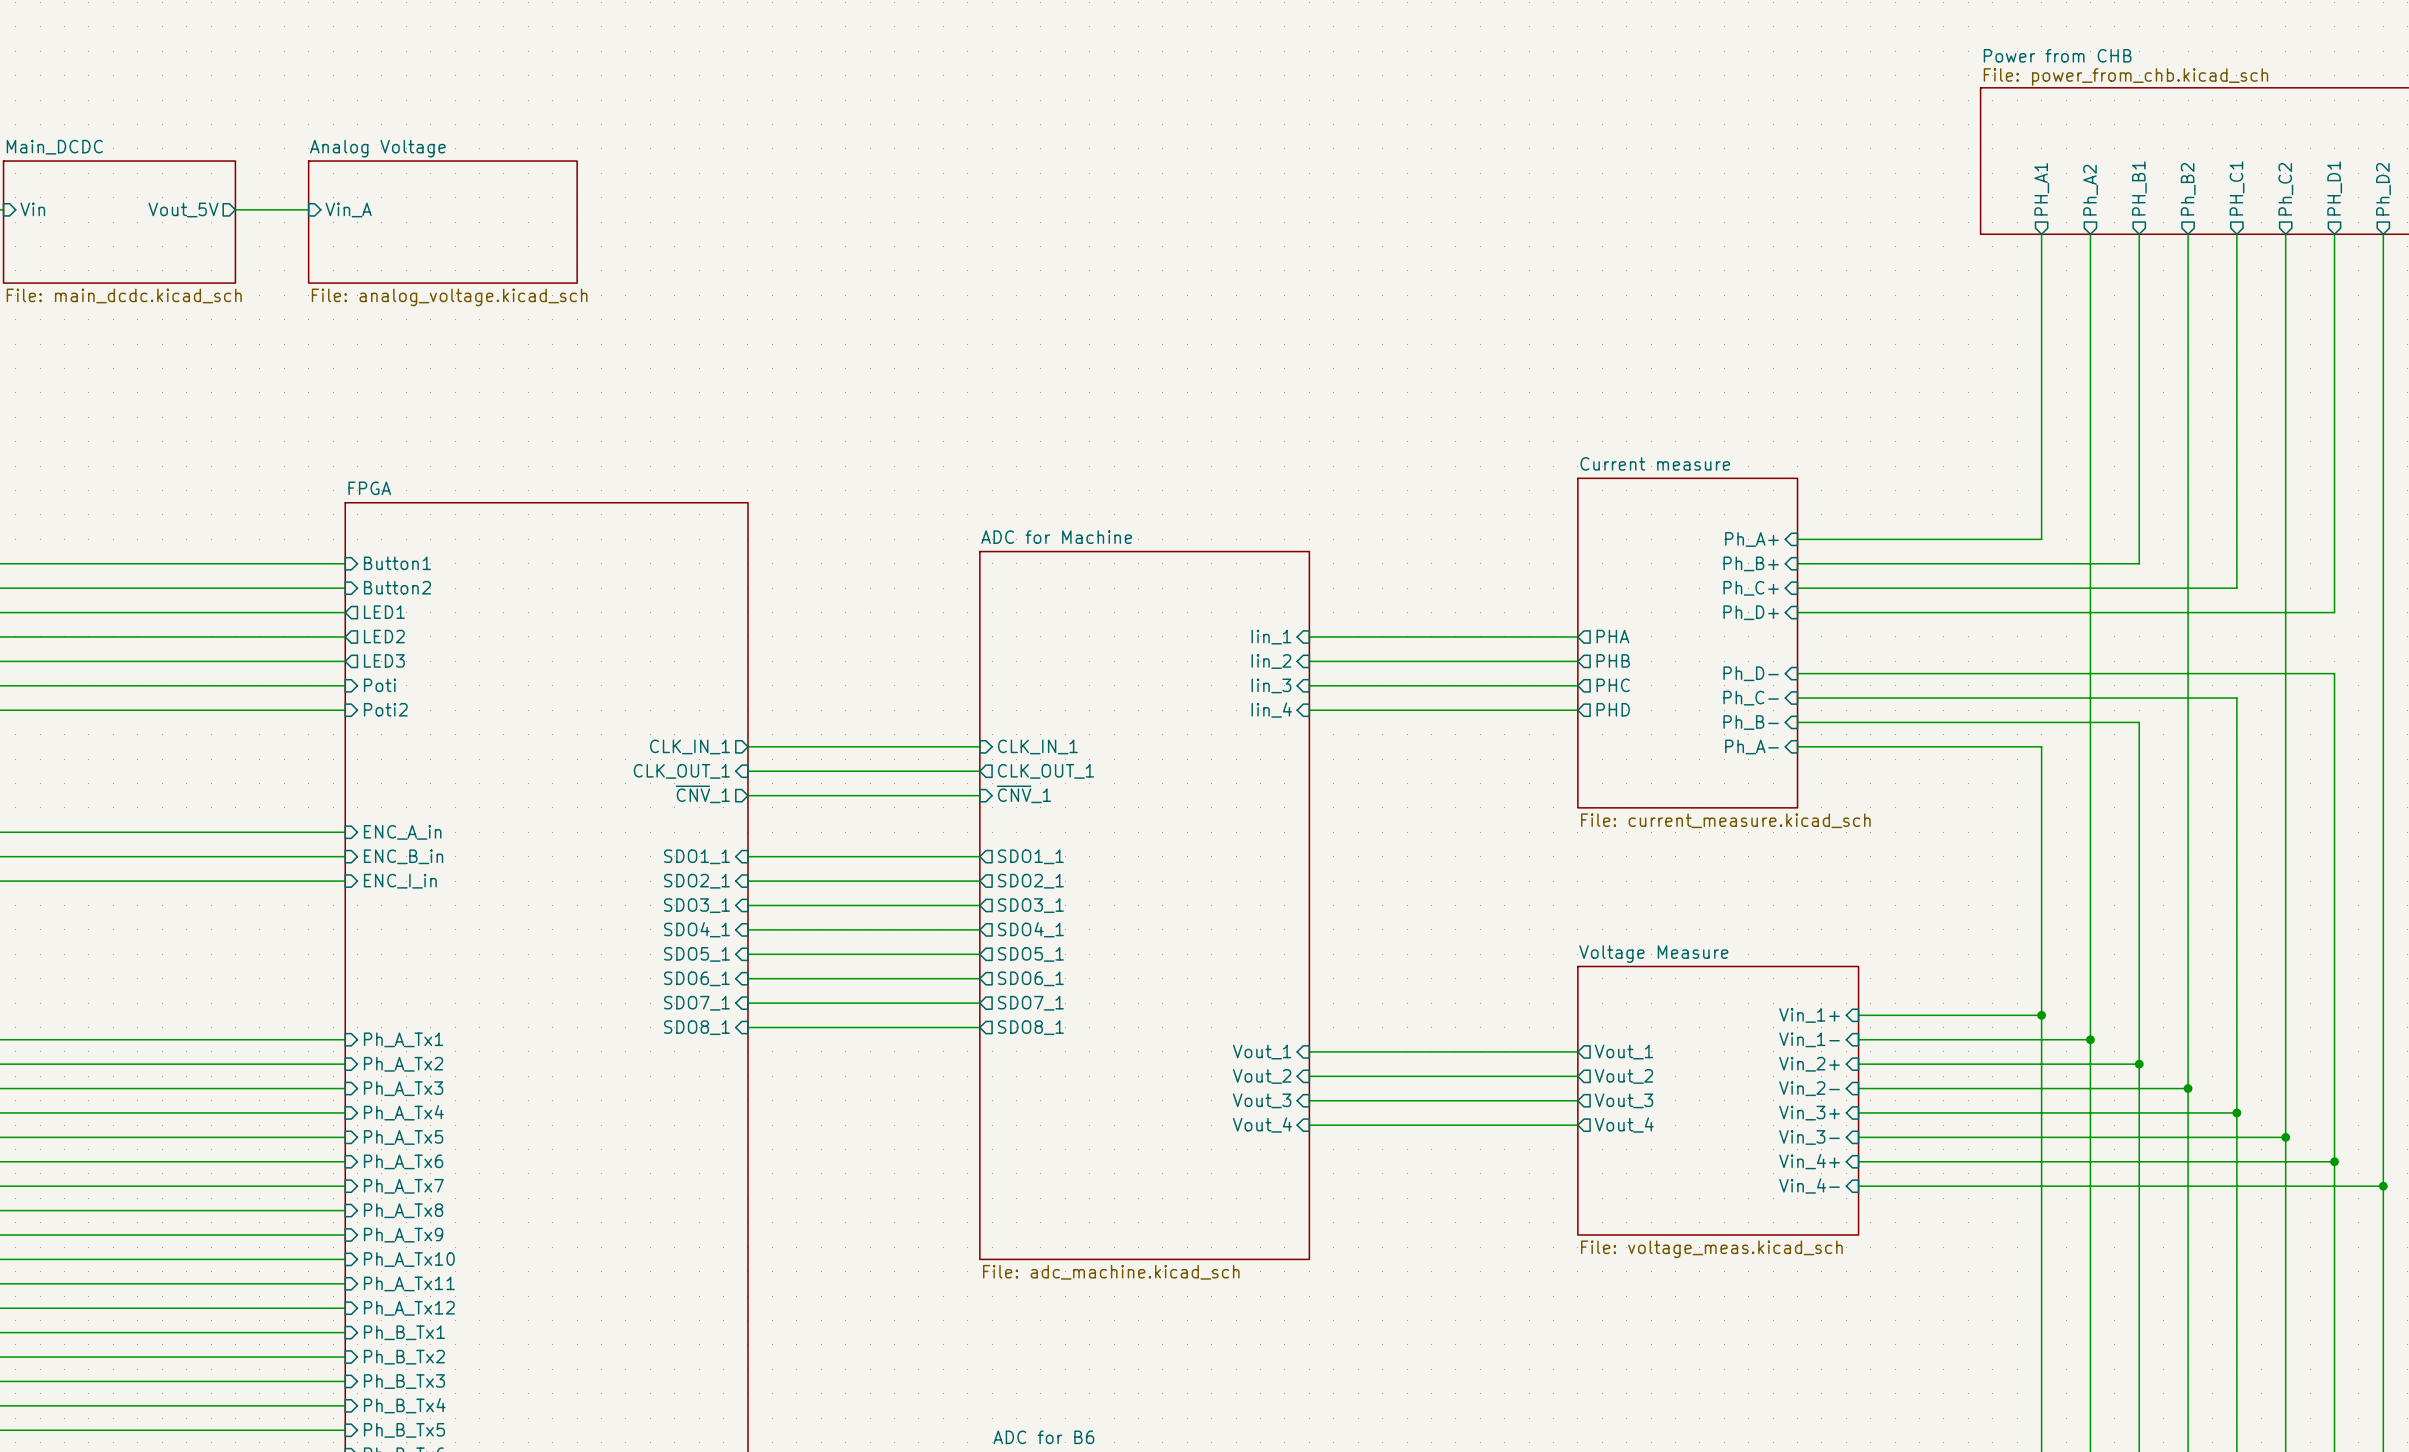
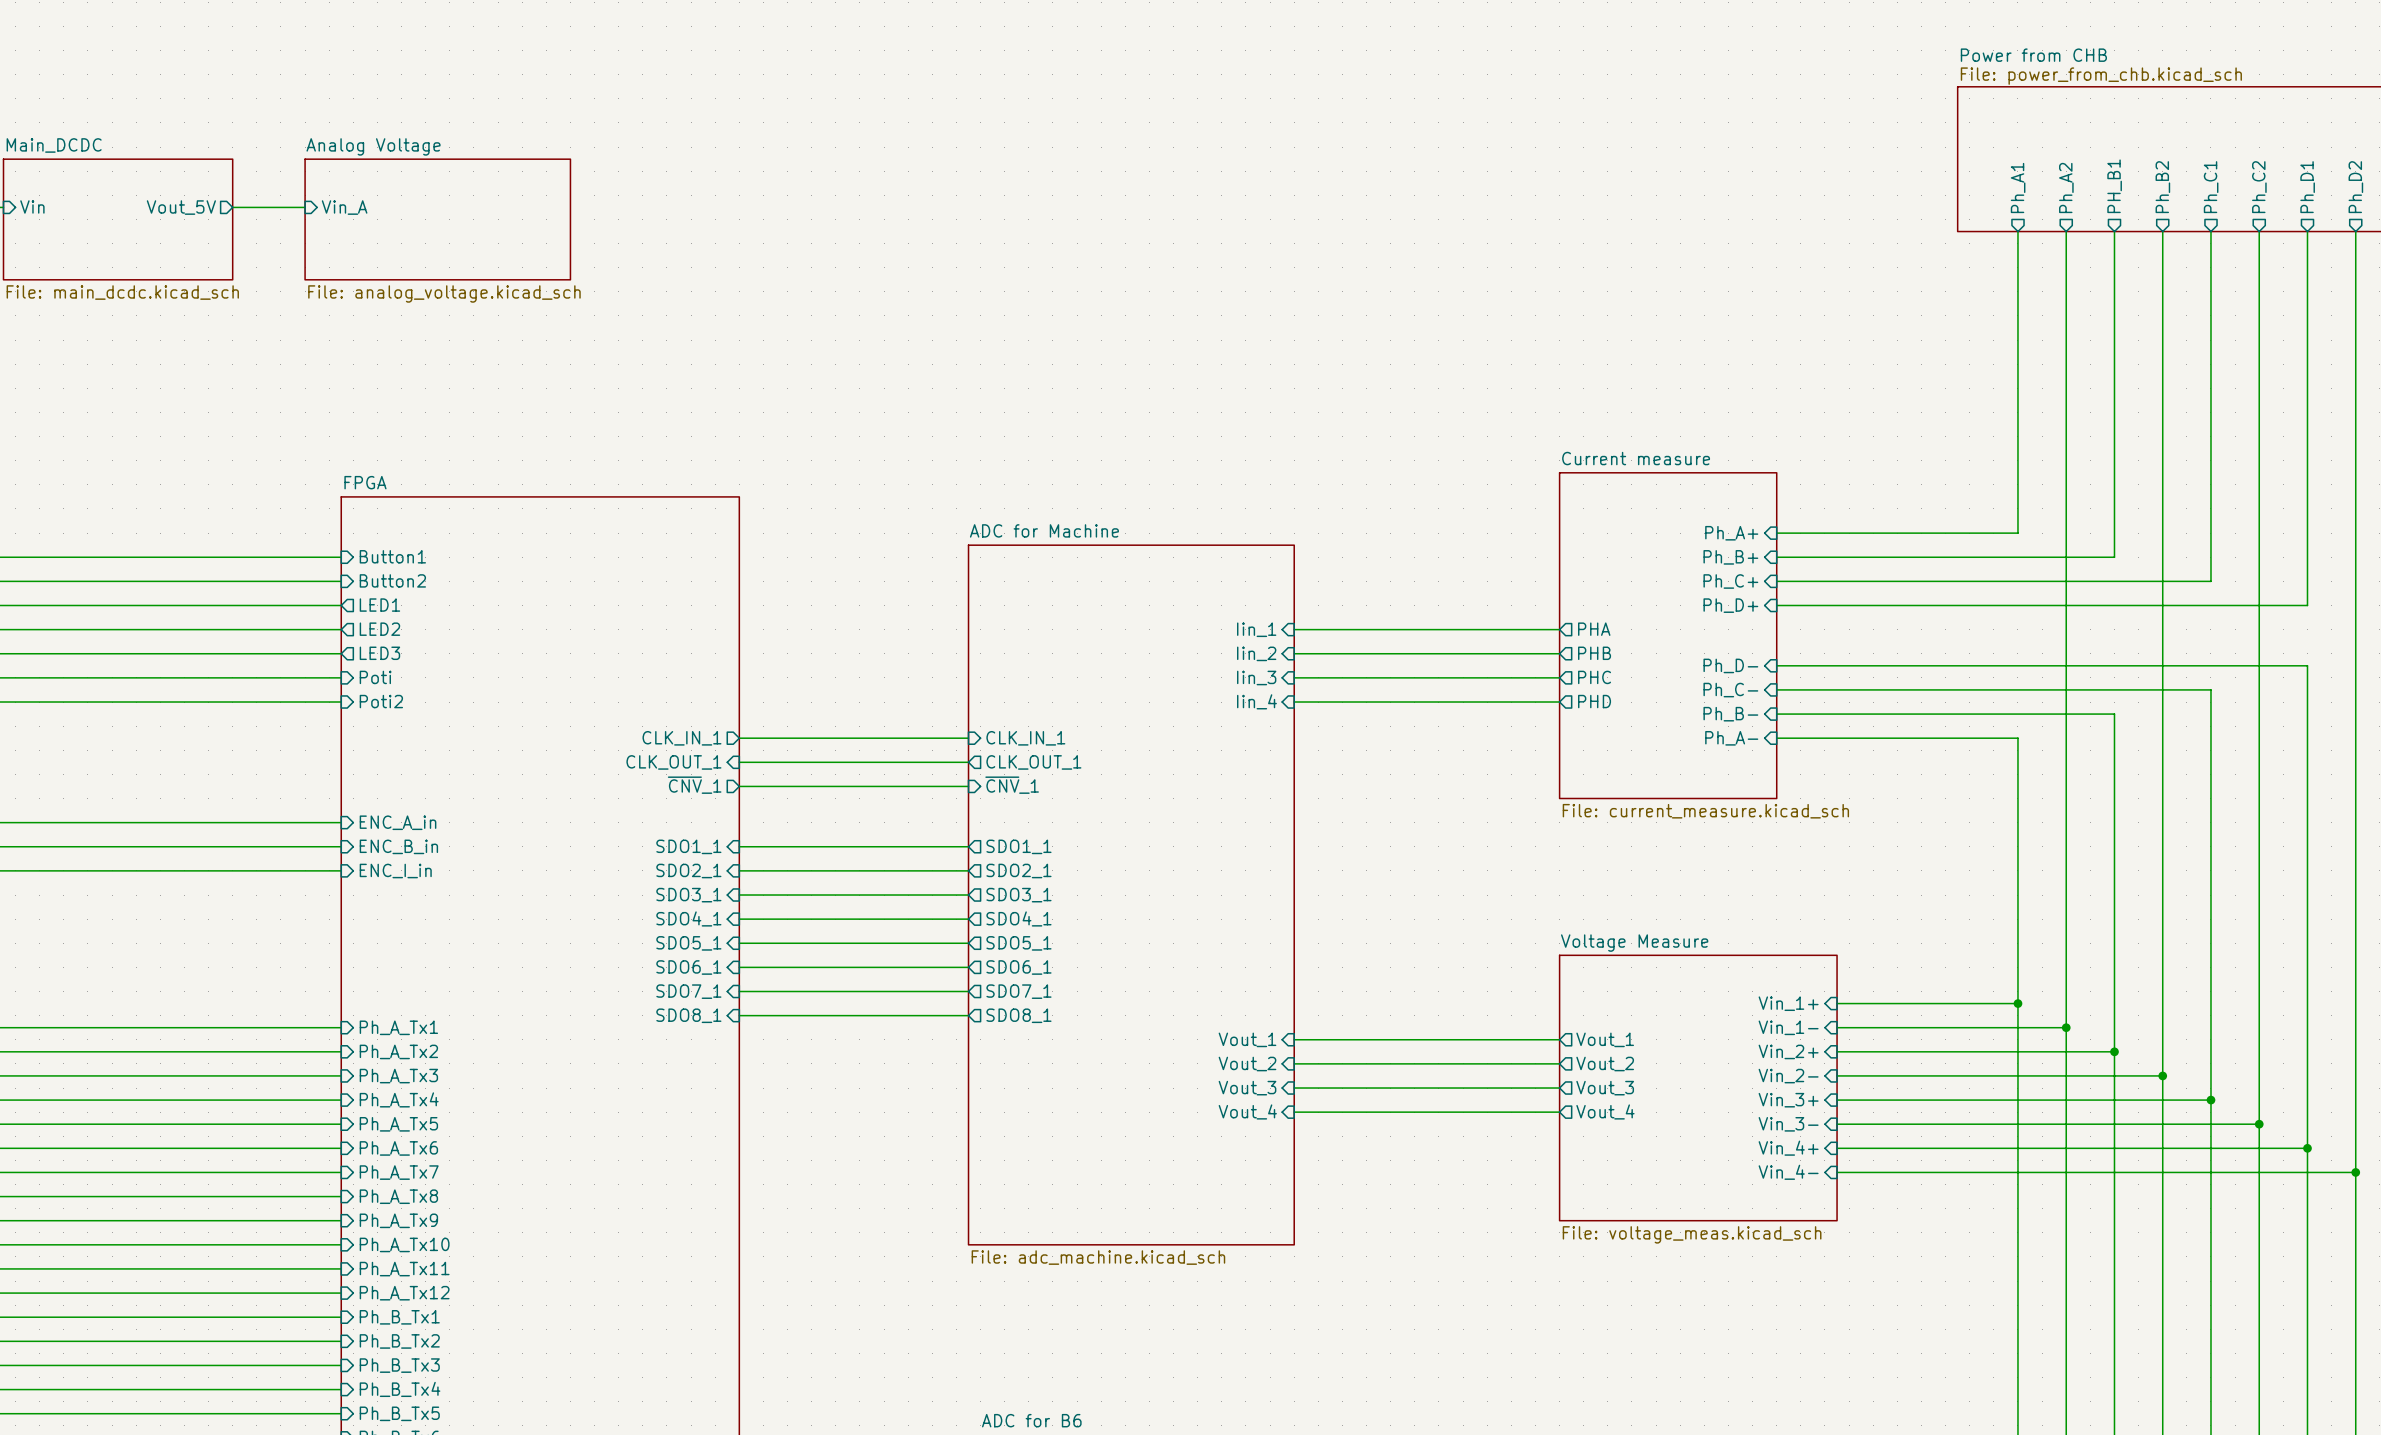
sheet pin: PH_C1 (2237, 188) -> Ph_C1 (2211, 187)
sheet pin: PH_D1 (2334, 188) -> Ph_D1 (2307, 187)
sheet pin: PH_A1 (2041, 189) -> Ph_A1 (2018, 187)

